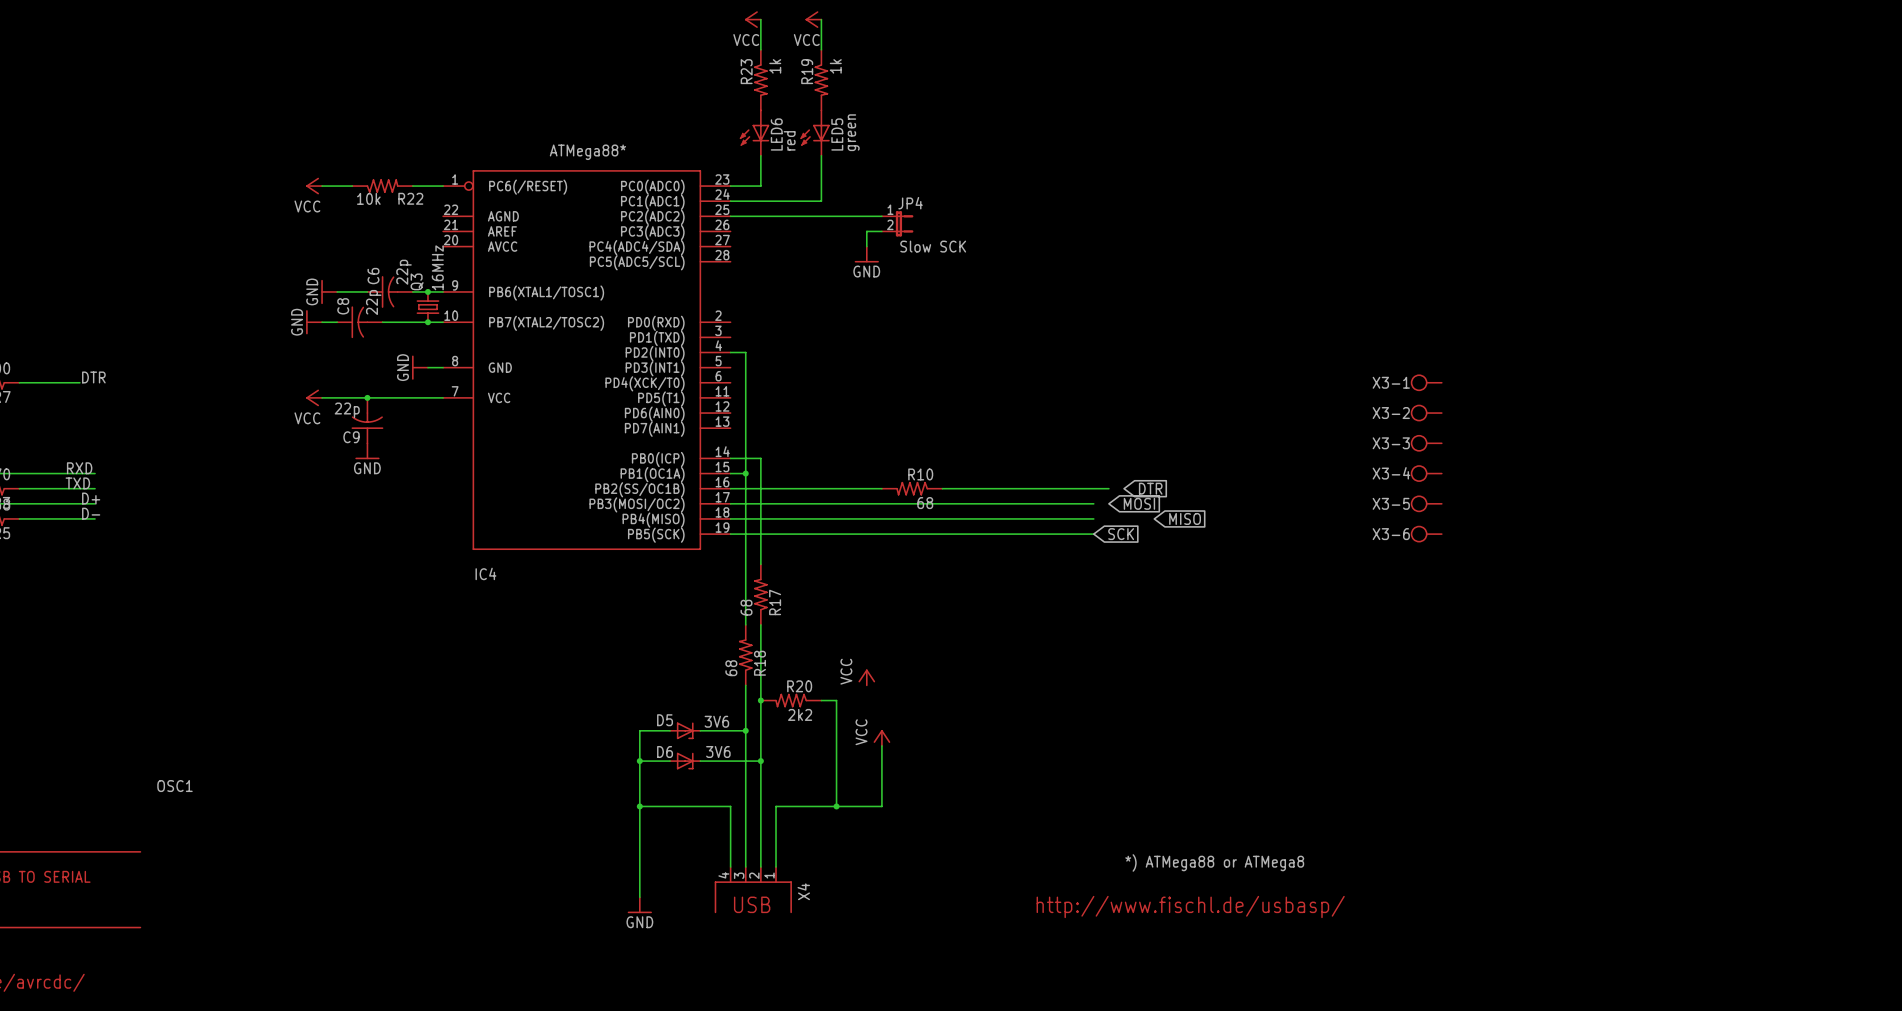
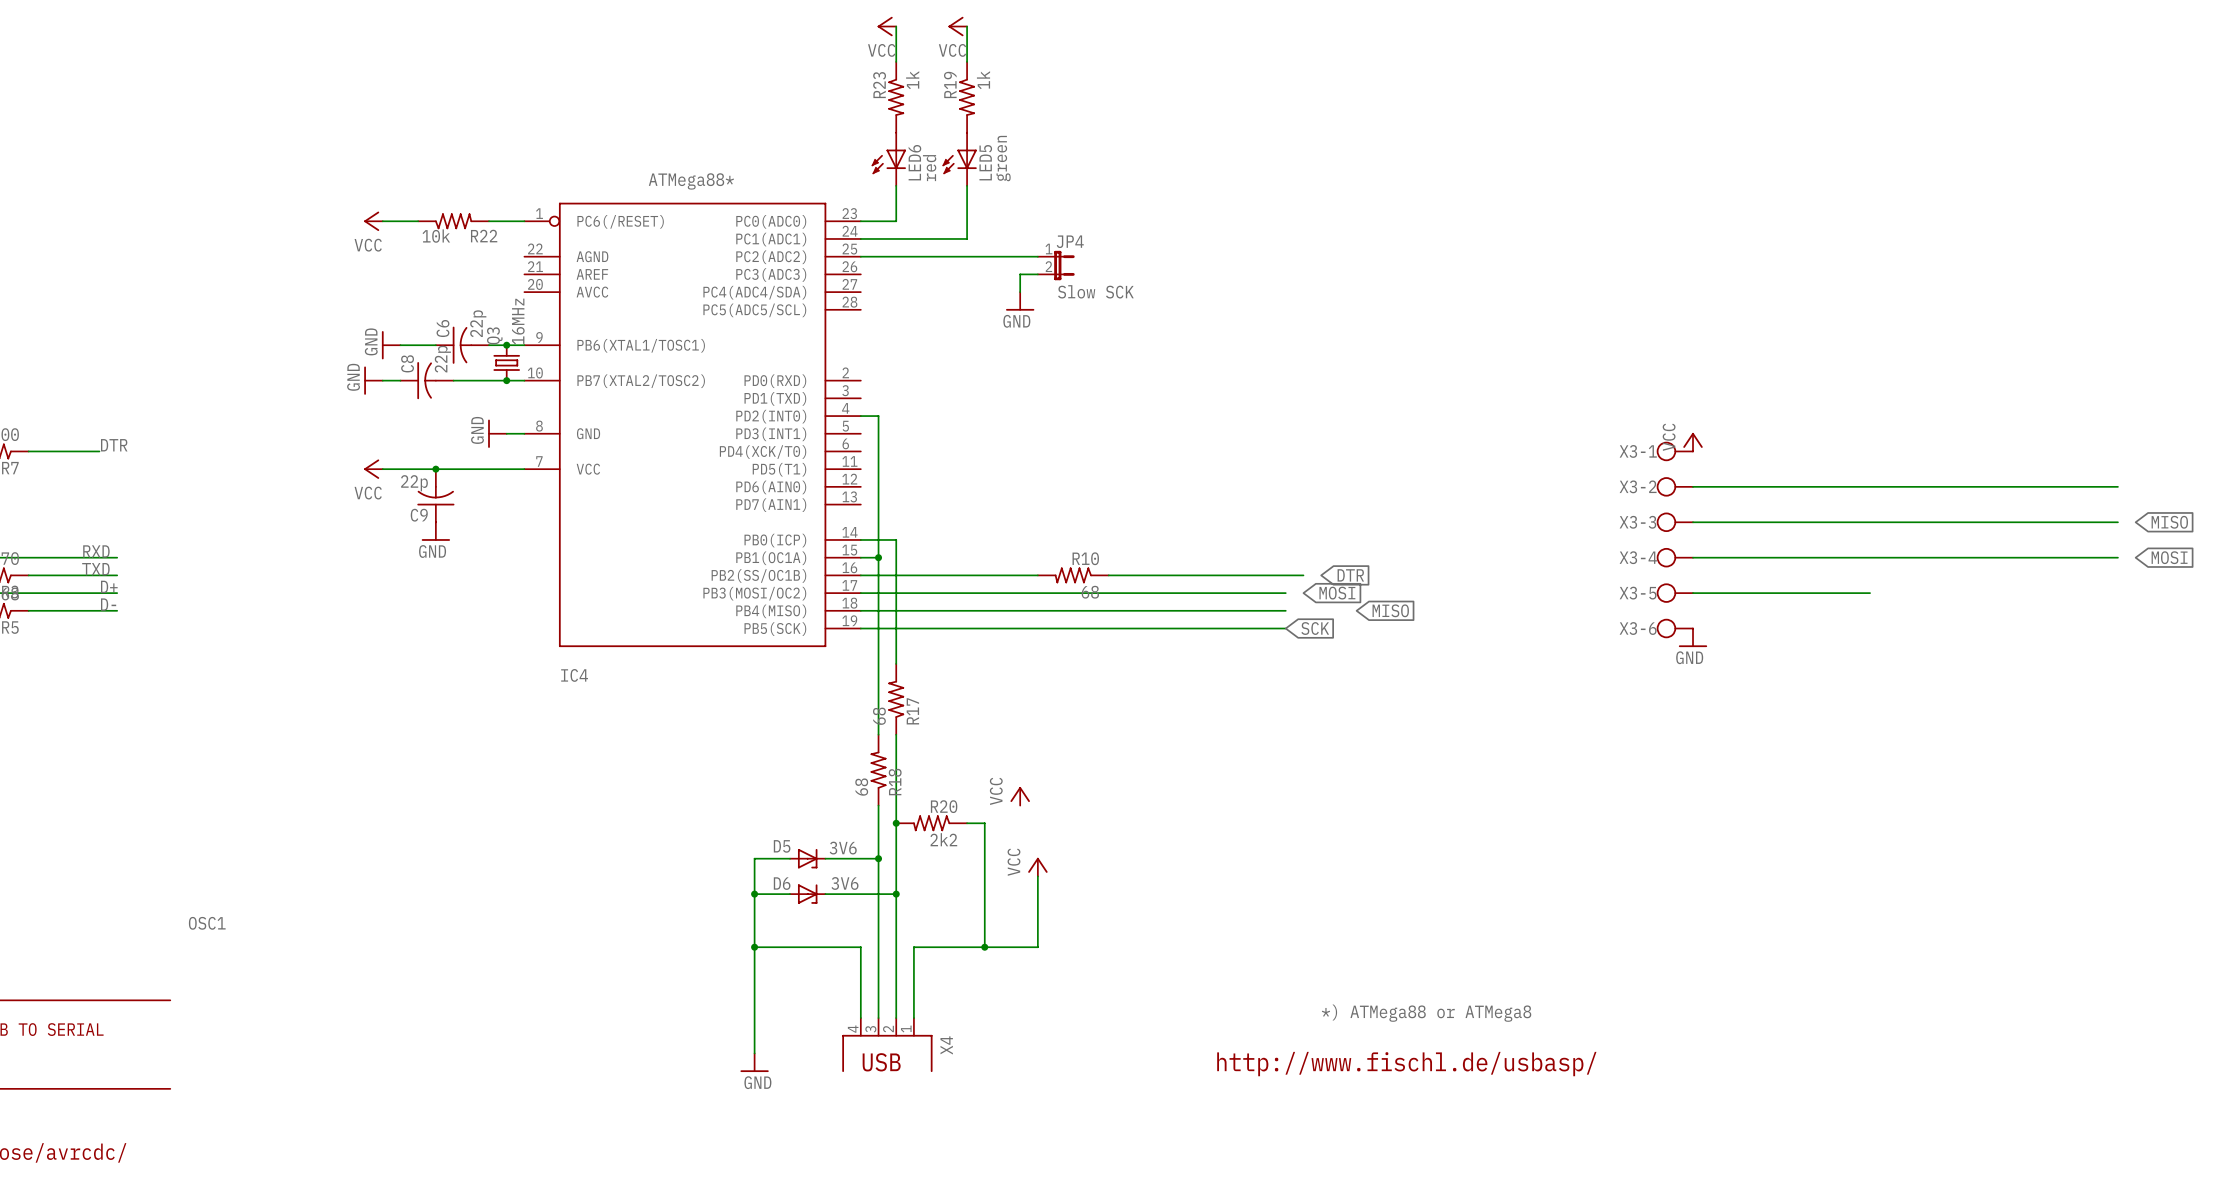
power symbol: none -> VCC (1693, 442)
wire: none -> (1693, 486) (2117, 486)
wire: none -> (1693, 522) (2117, 522)
global label: none -> MISO (2169, 522)
wire: none -> (1693, 557) (2117, 557)
global label: none -> MOSI (2169, 557)
wire: none -> (1693, 593) (1870, 593)
power symbol: none -> GND (1693, 637)

